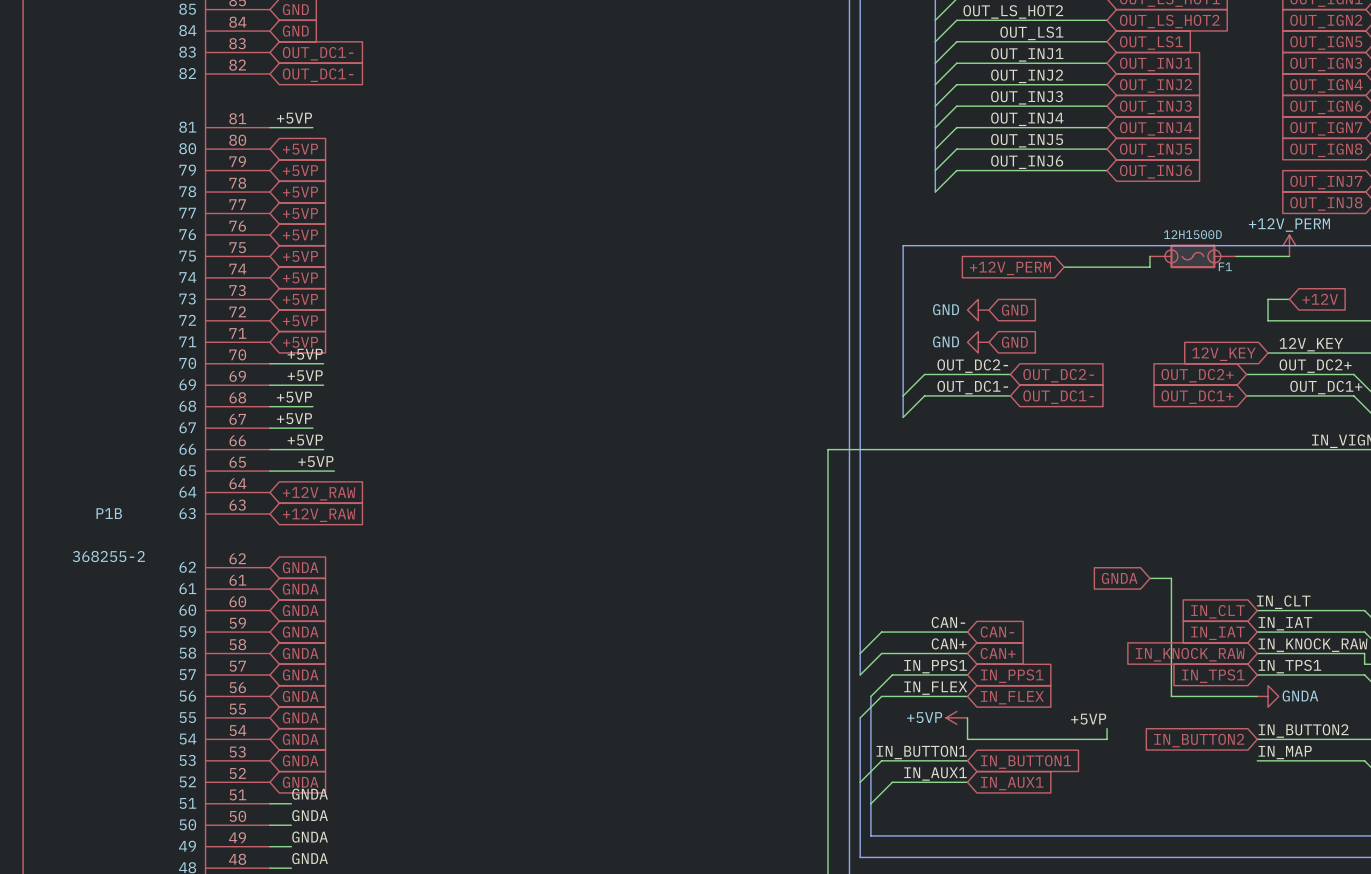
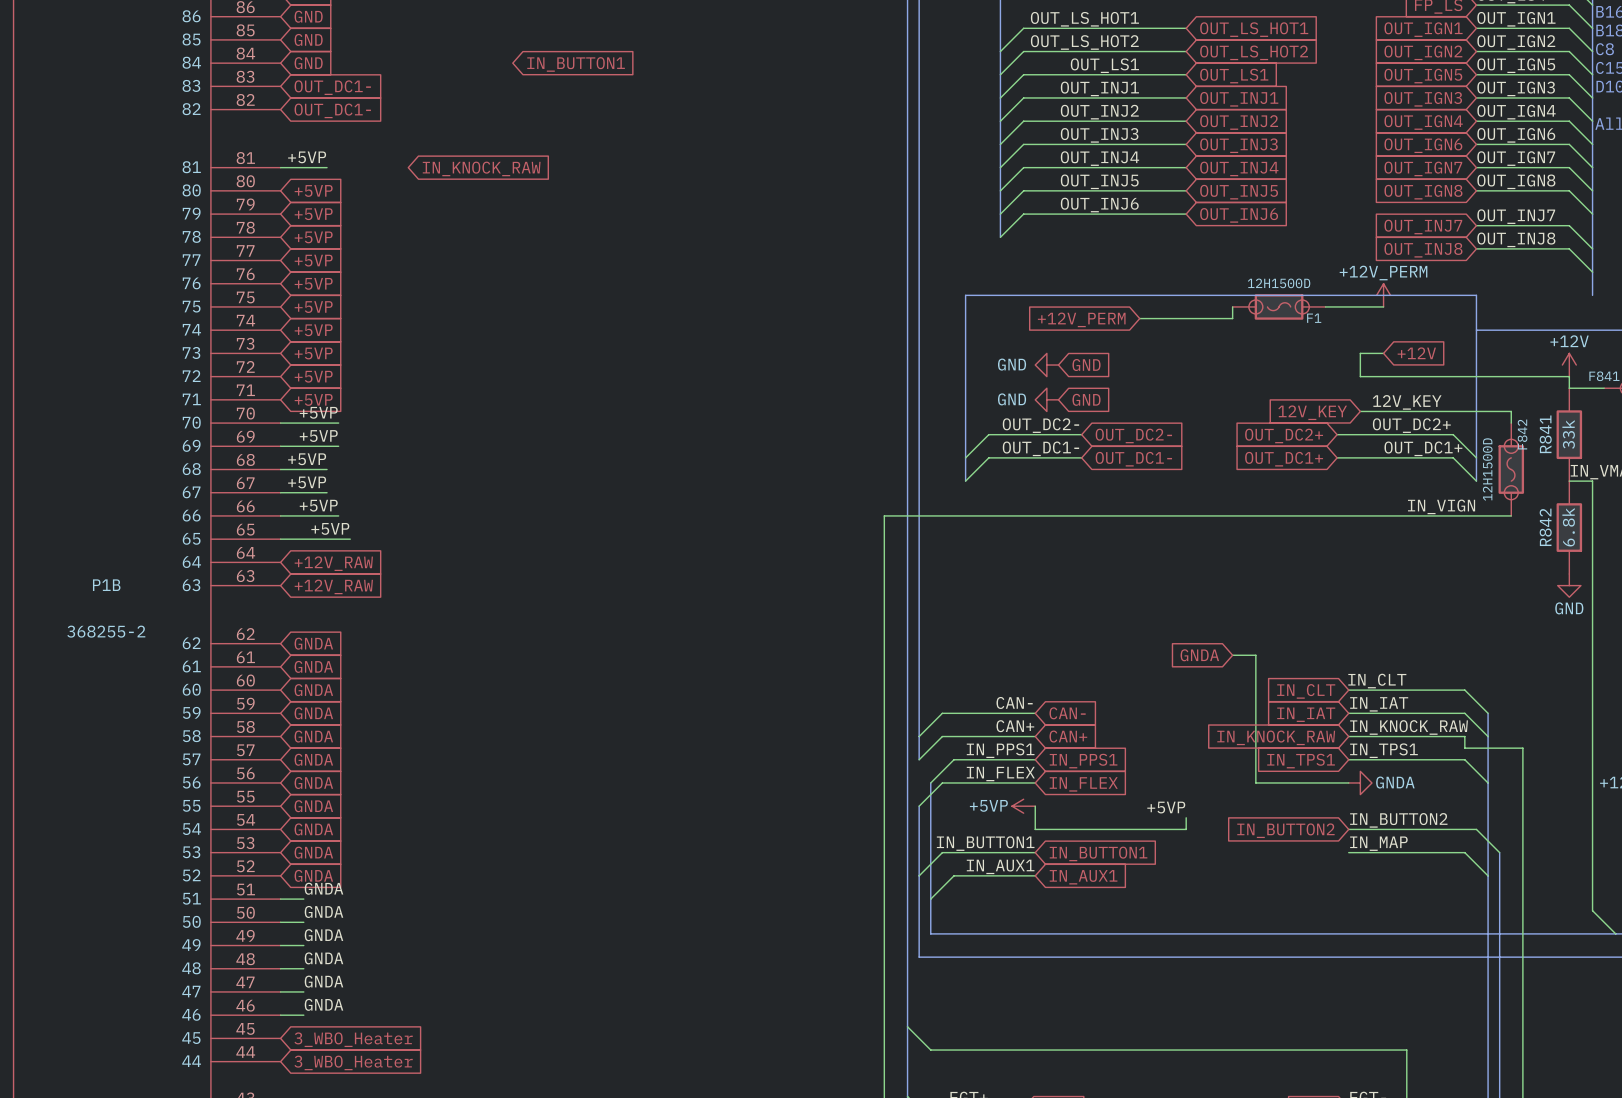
global label: none -> IN_BUTTON1 (576, 64)
global label: none -> IN_KNOCK_RAW (481, 168)

